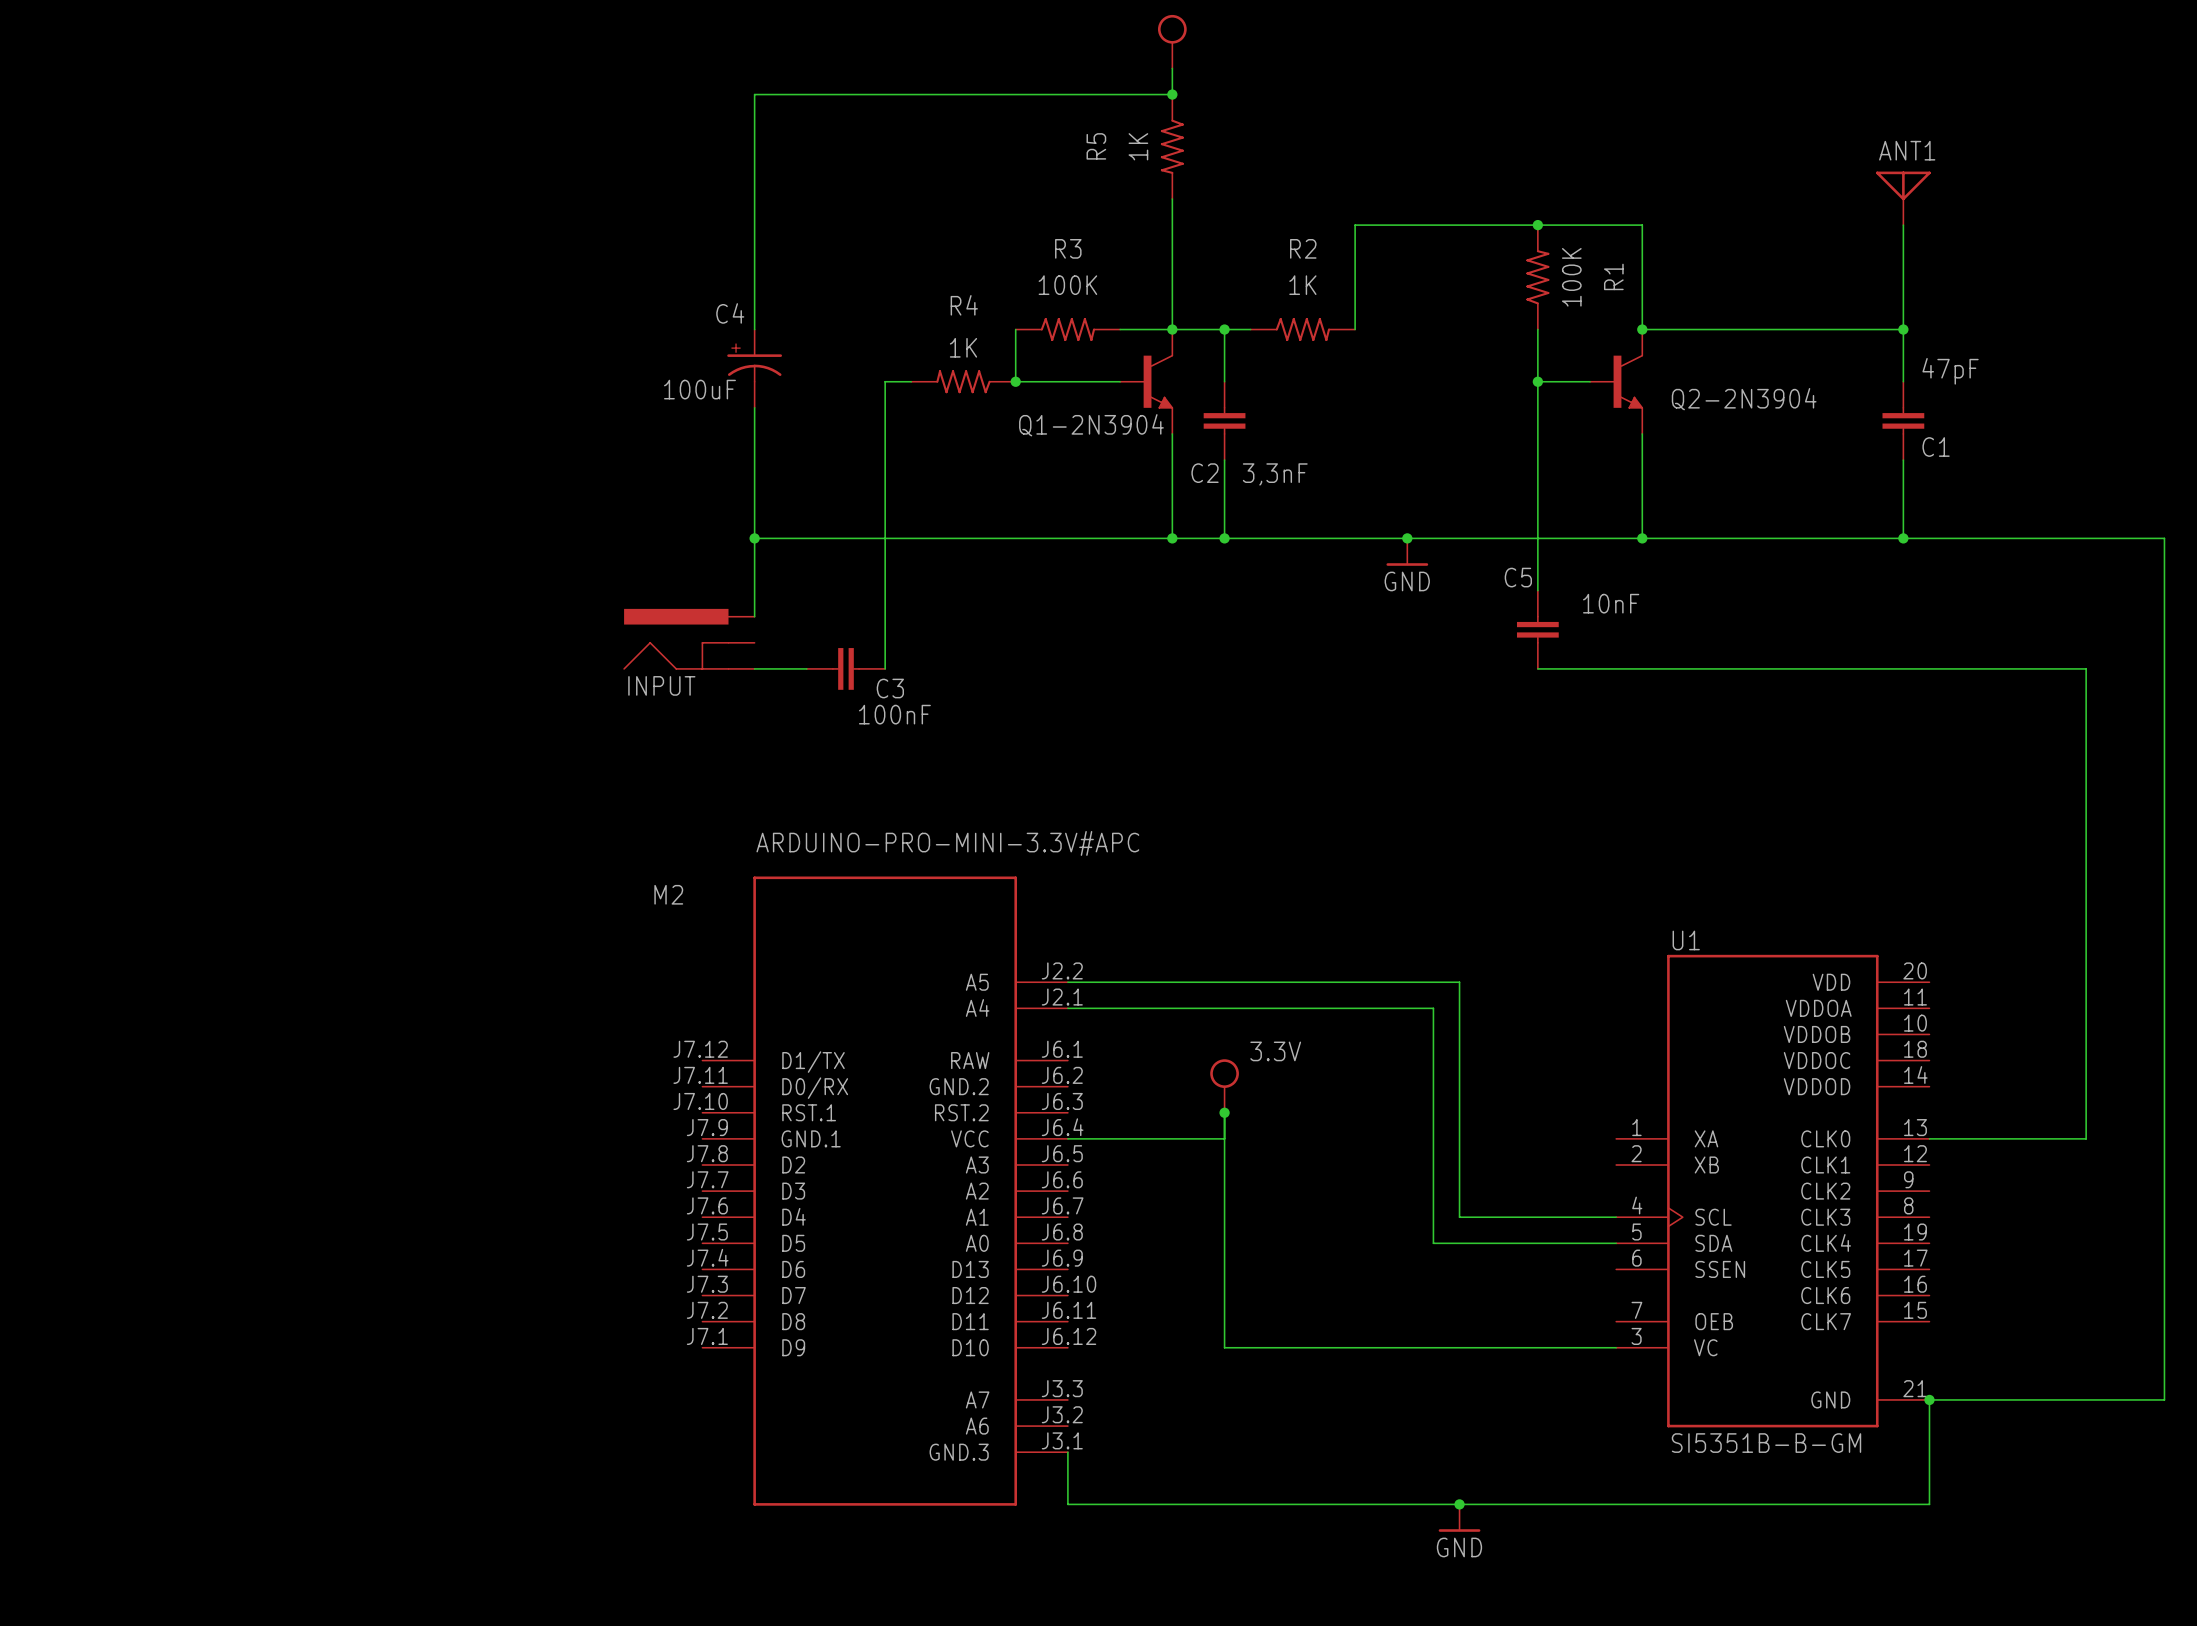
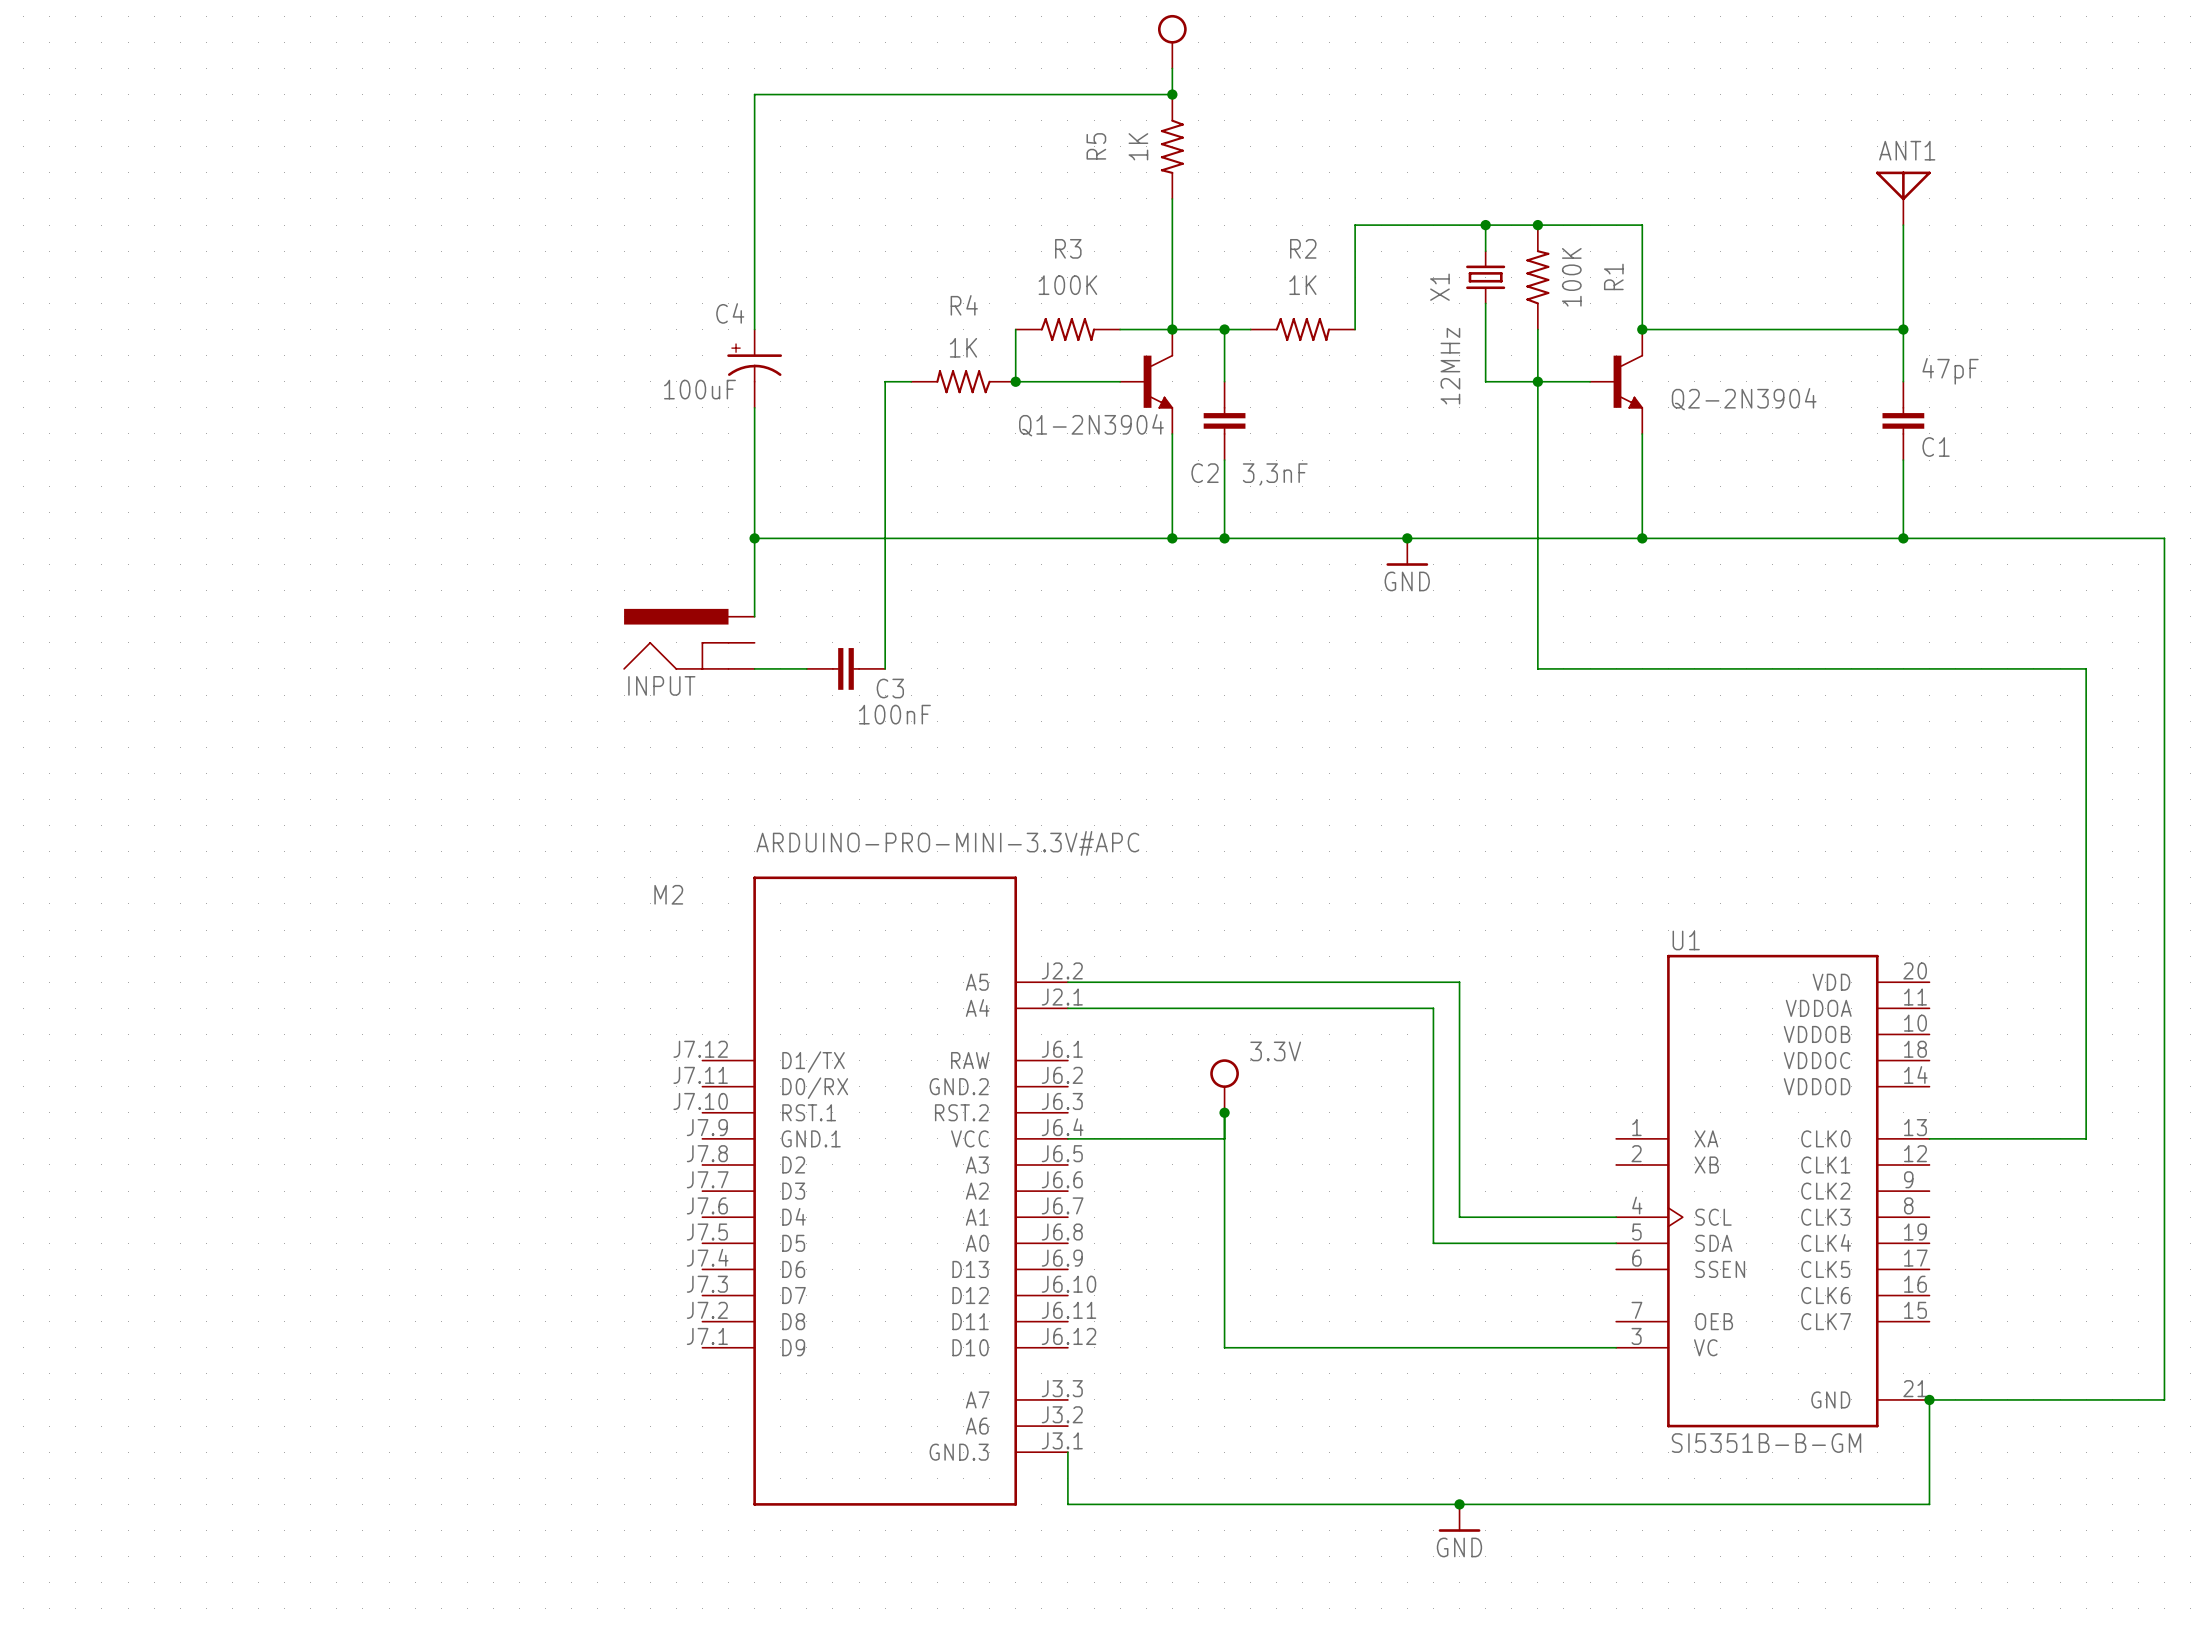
wire: none -> (1485, 225) (1485, 251)
junction: none -> (1485, 225)
X1: none -> 12MHz (1485, 277)
wire: none -> (1485, 303) (1485, 381) (1537, 381)
C5: 10nF (1537, 629) -> none

